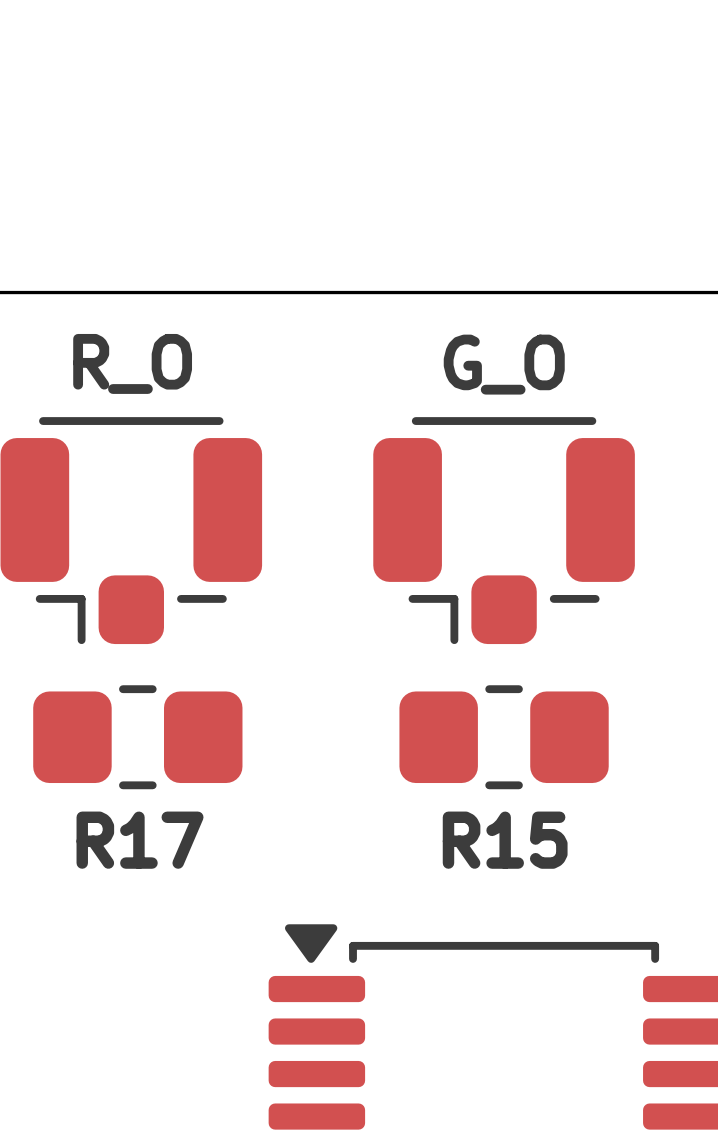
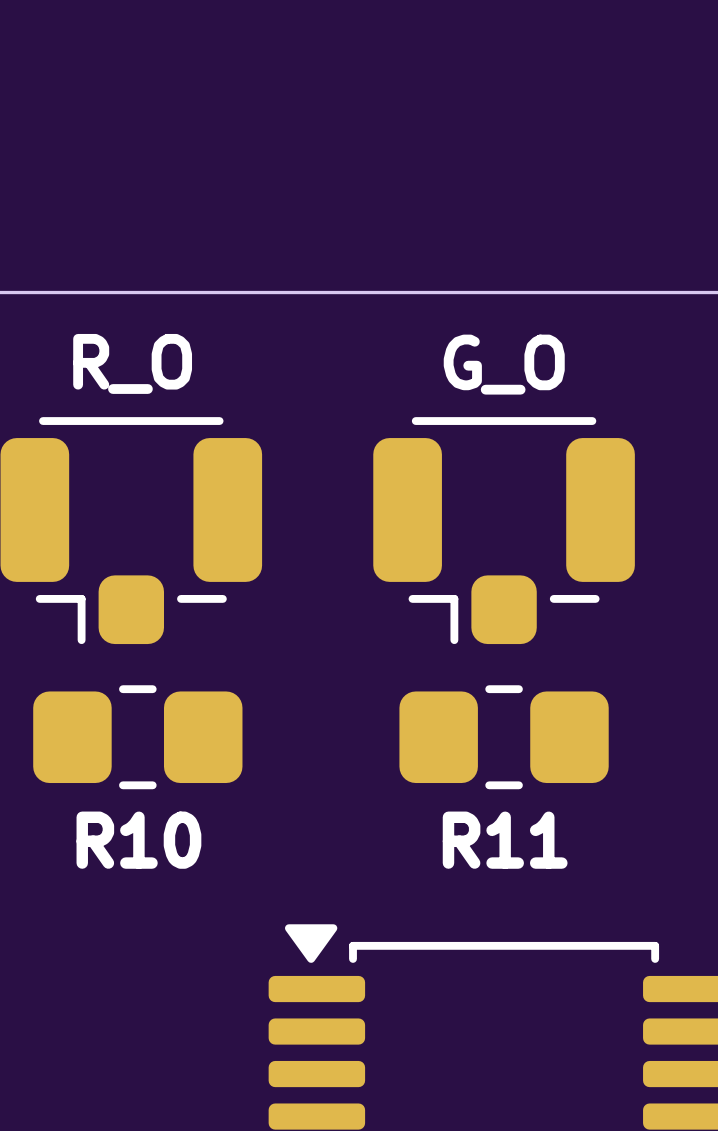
R17 name: R17 (140, 840) -> R10 (138, 840)
R15 name: R15 (505, 840) -> R11 (505, 840)

